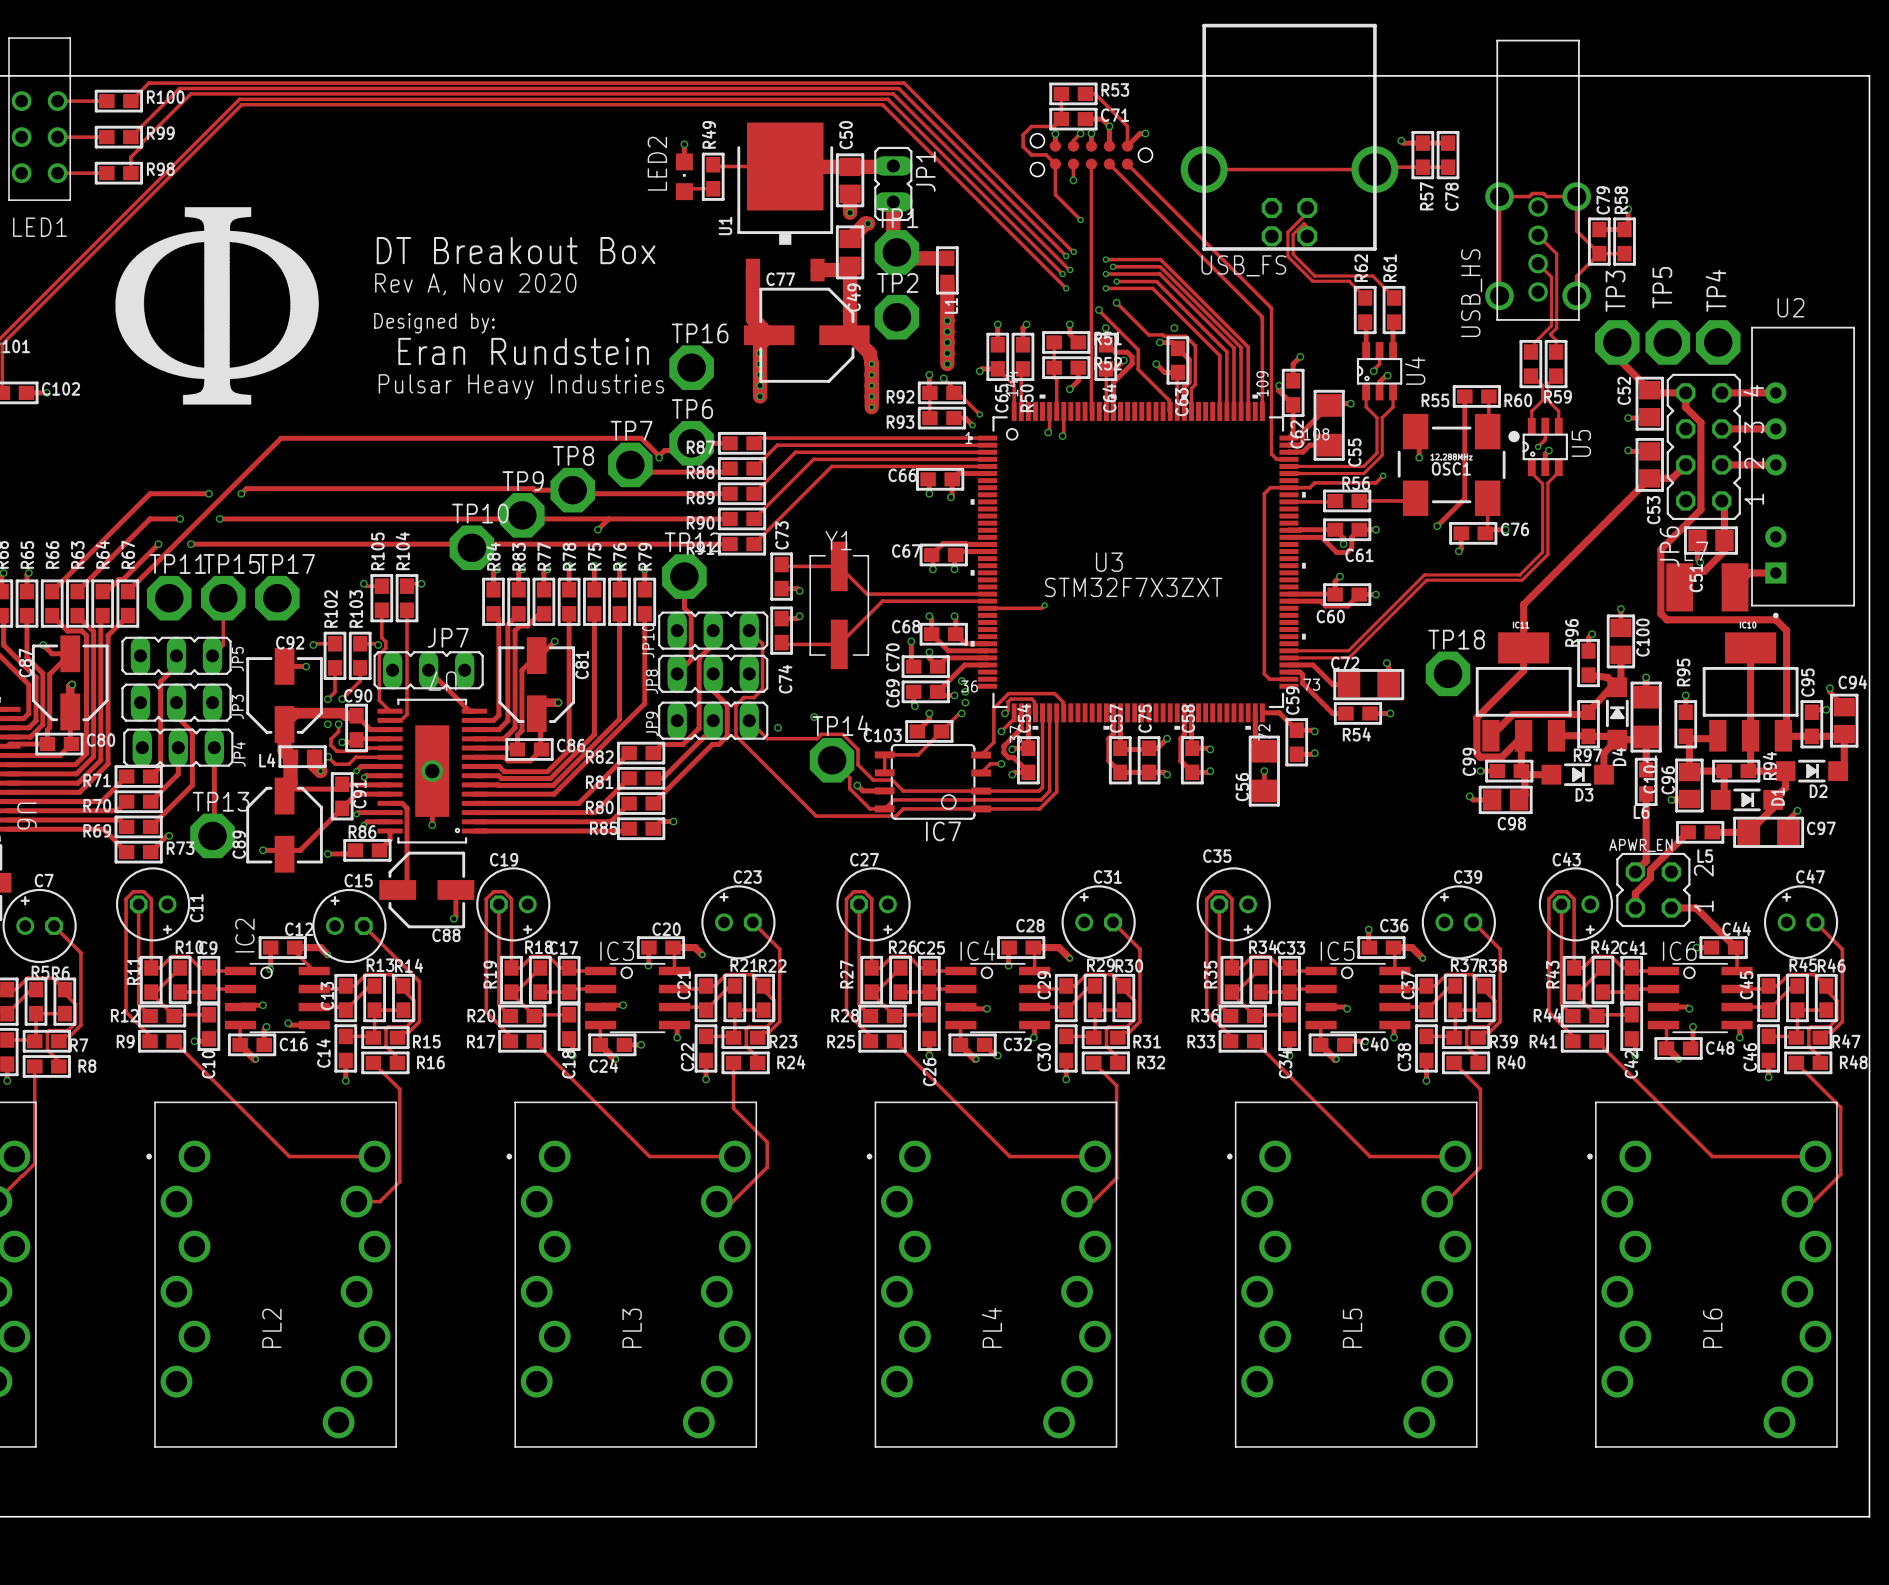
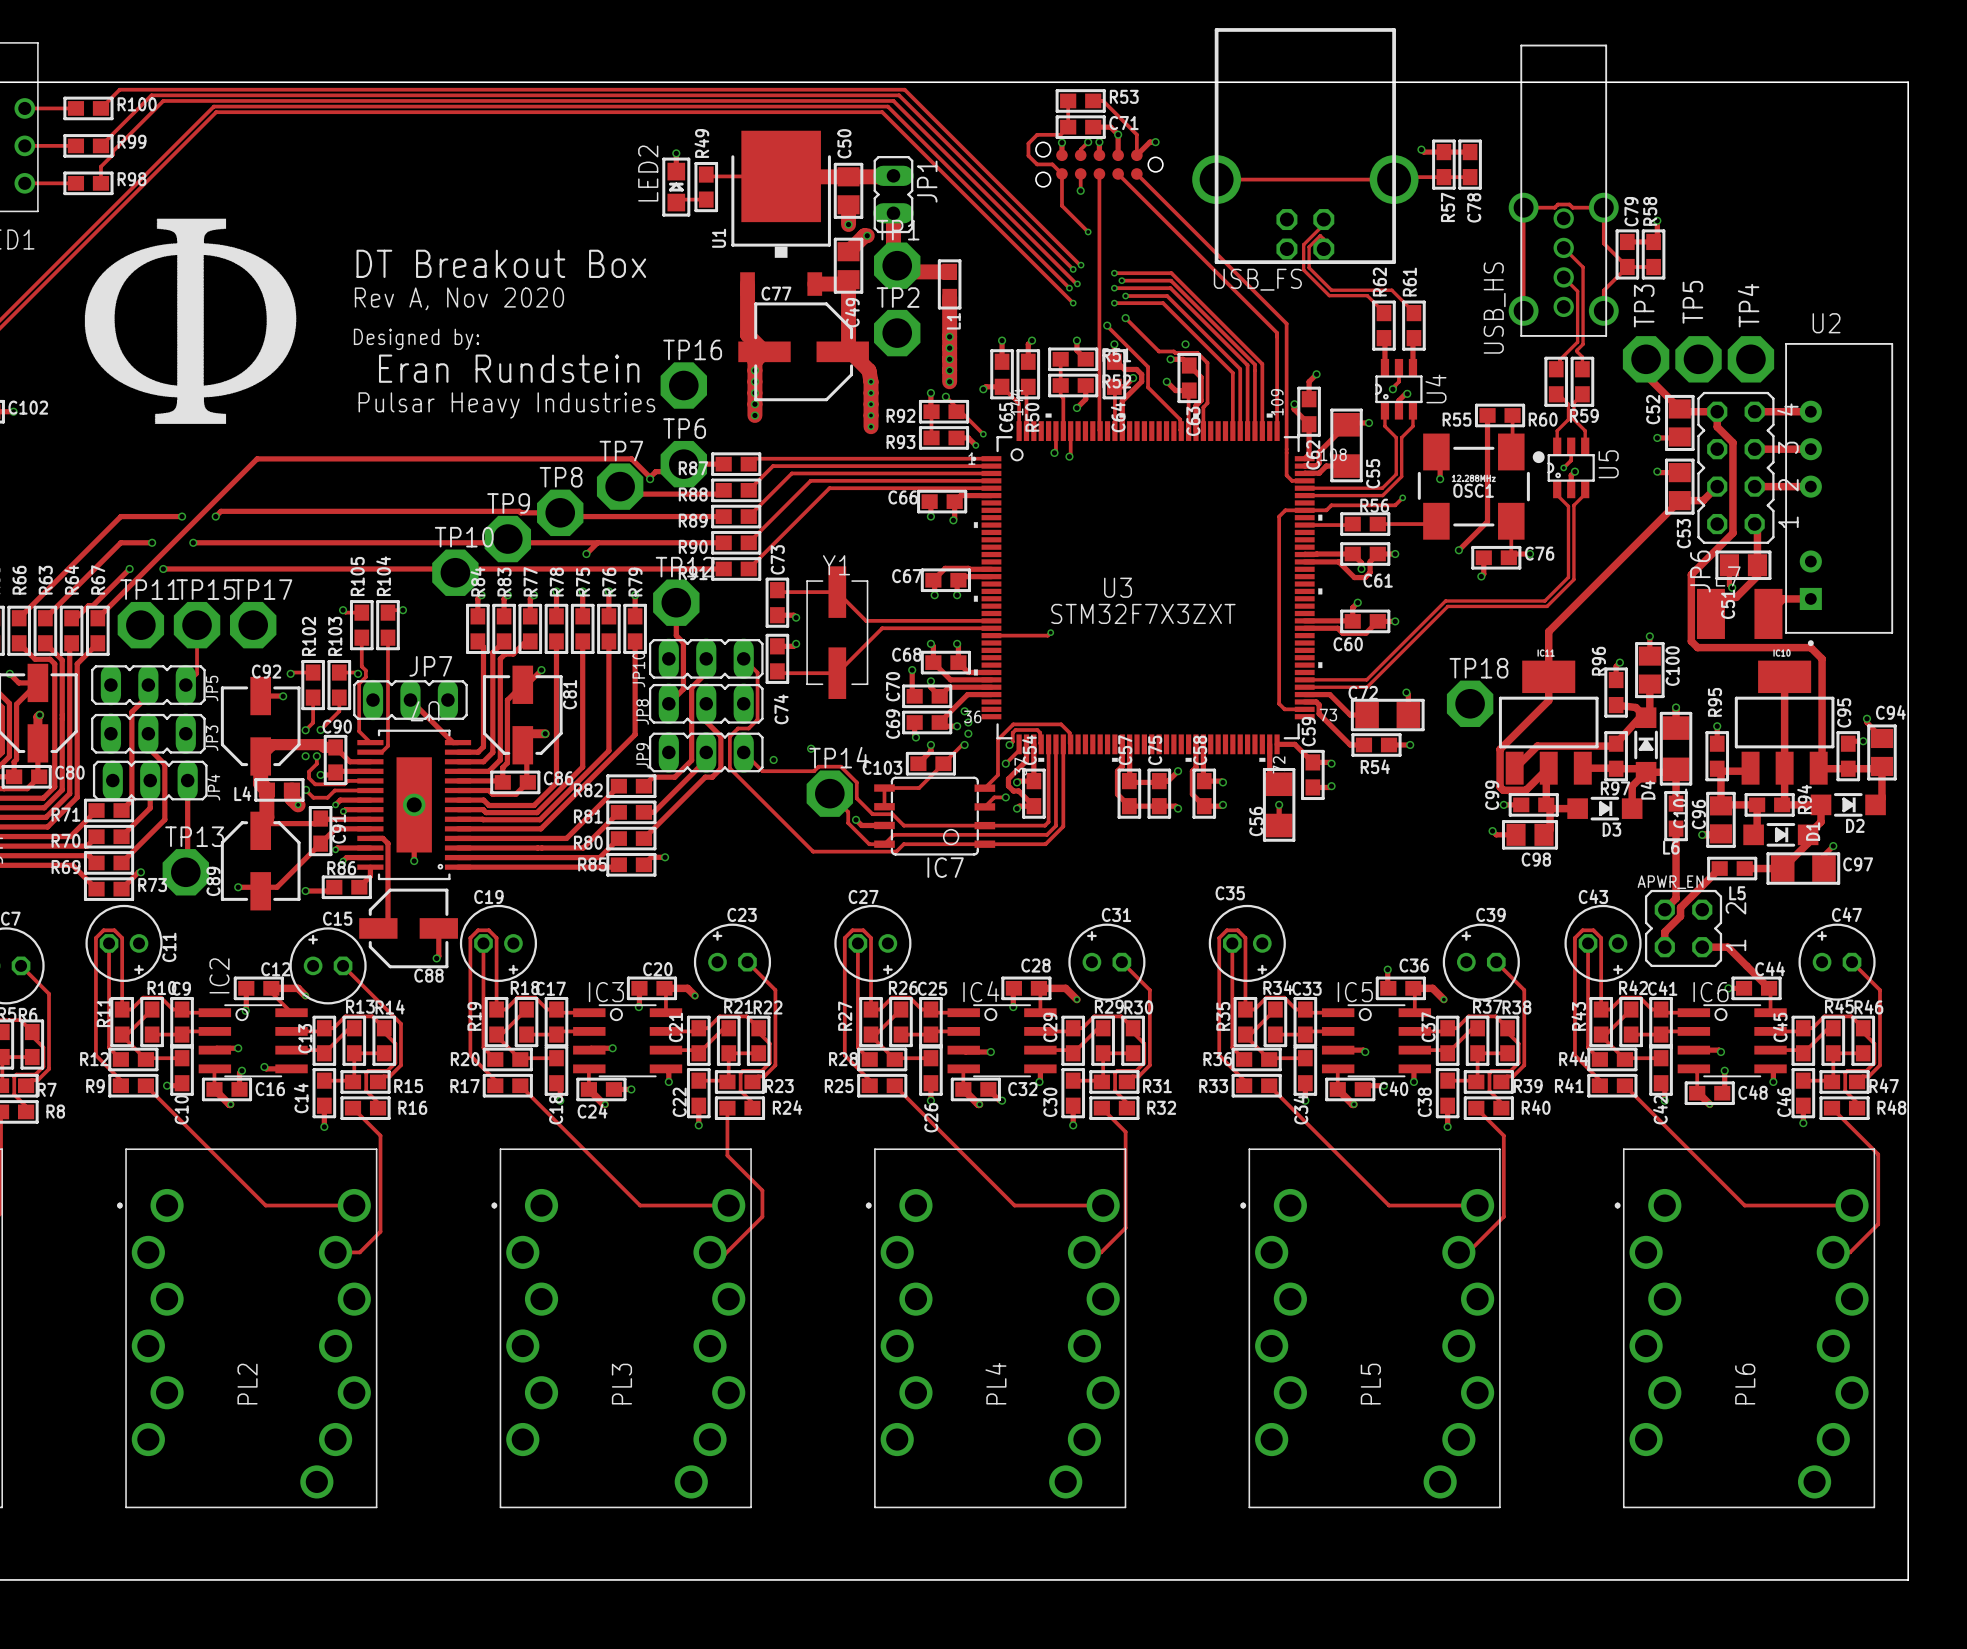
LED2 footprint: [675, 153, 693, 201] -> [662, 157, 691, 217]

